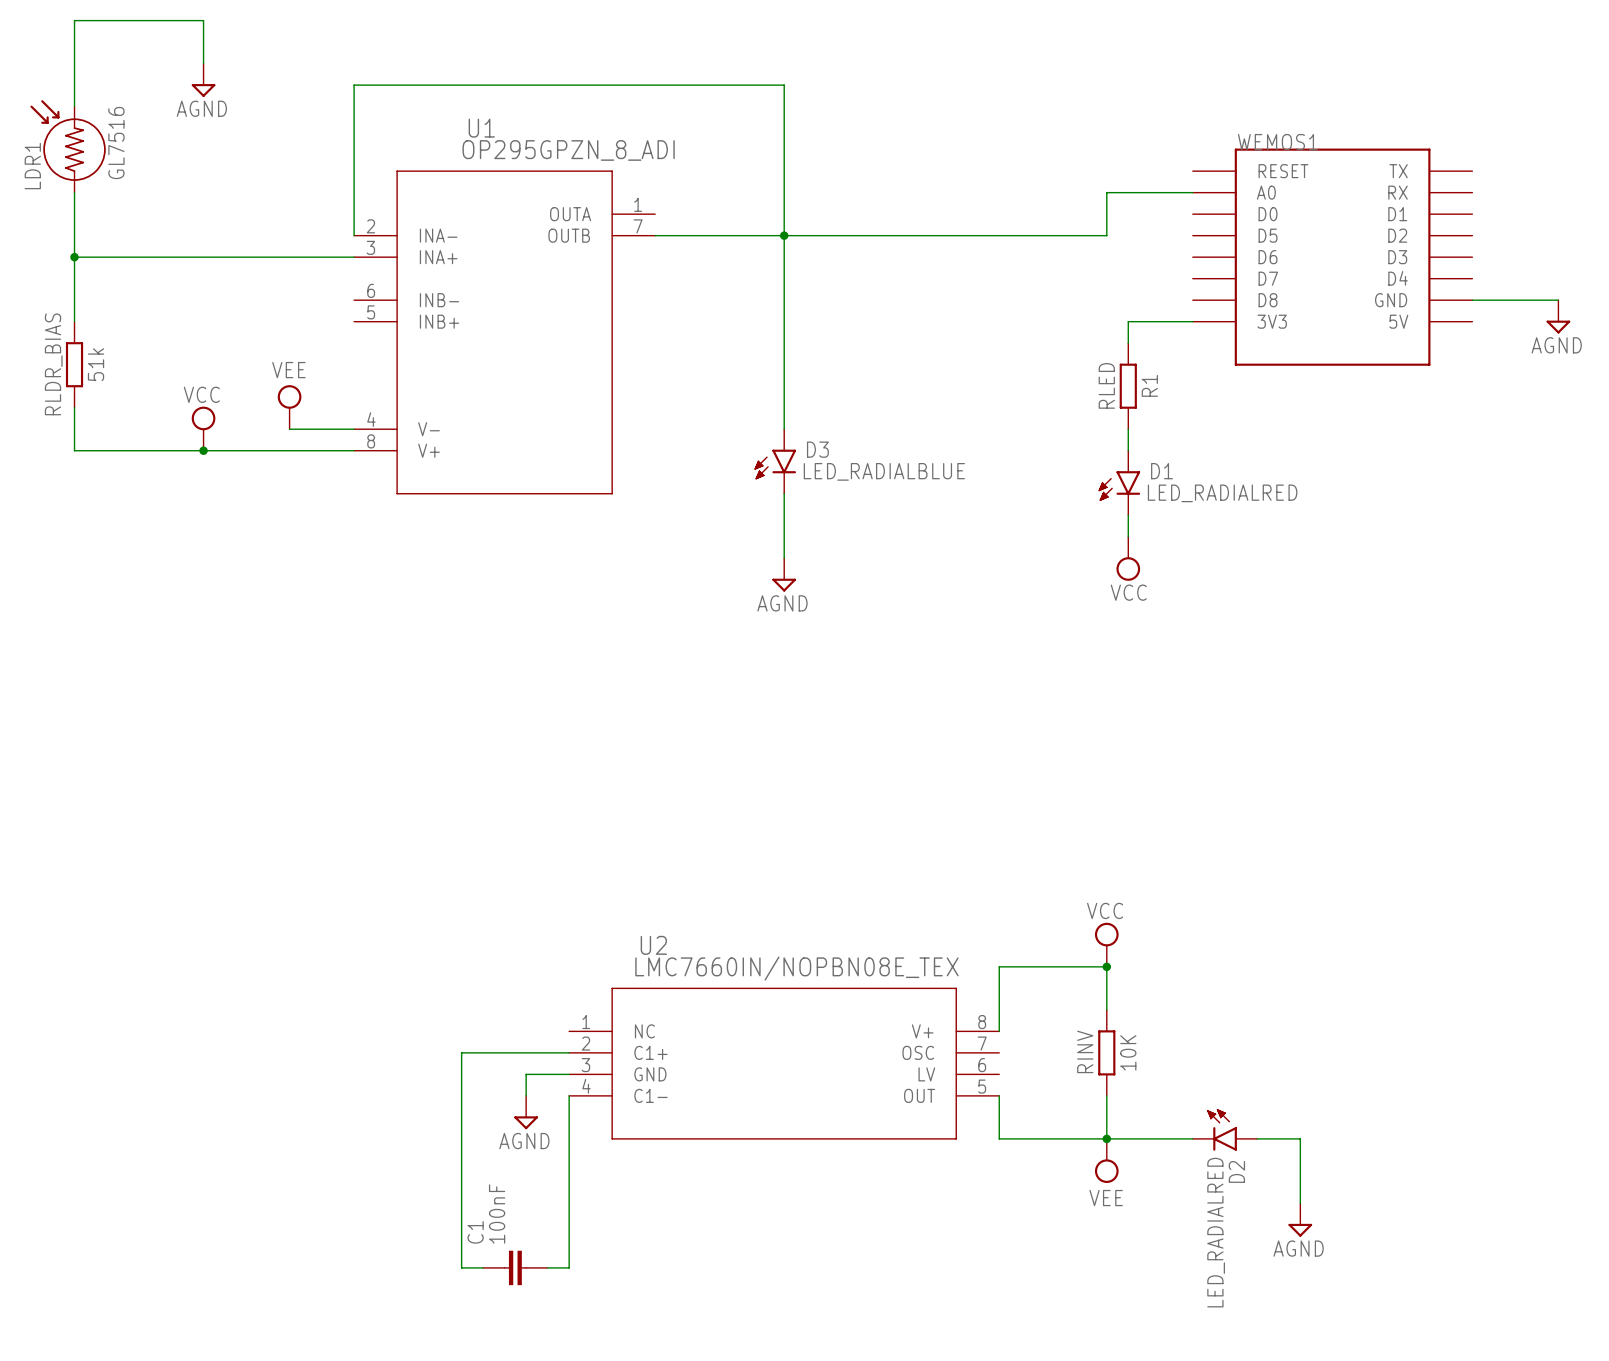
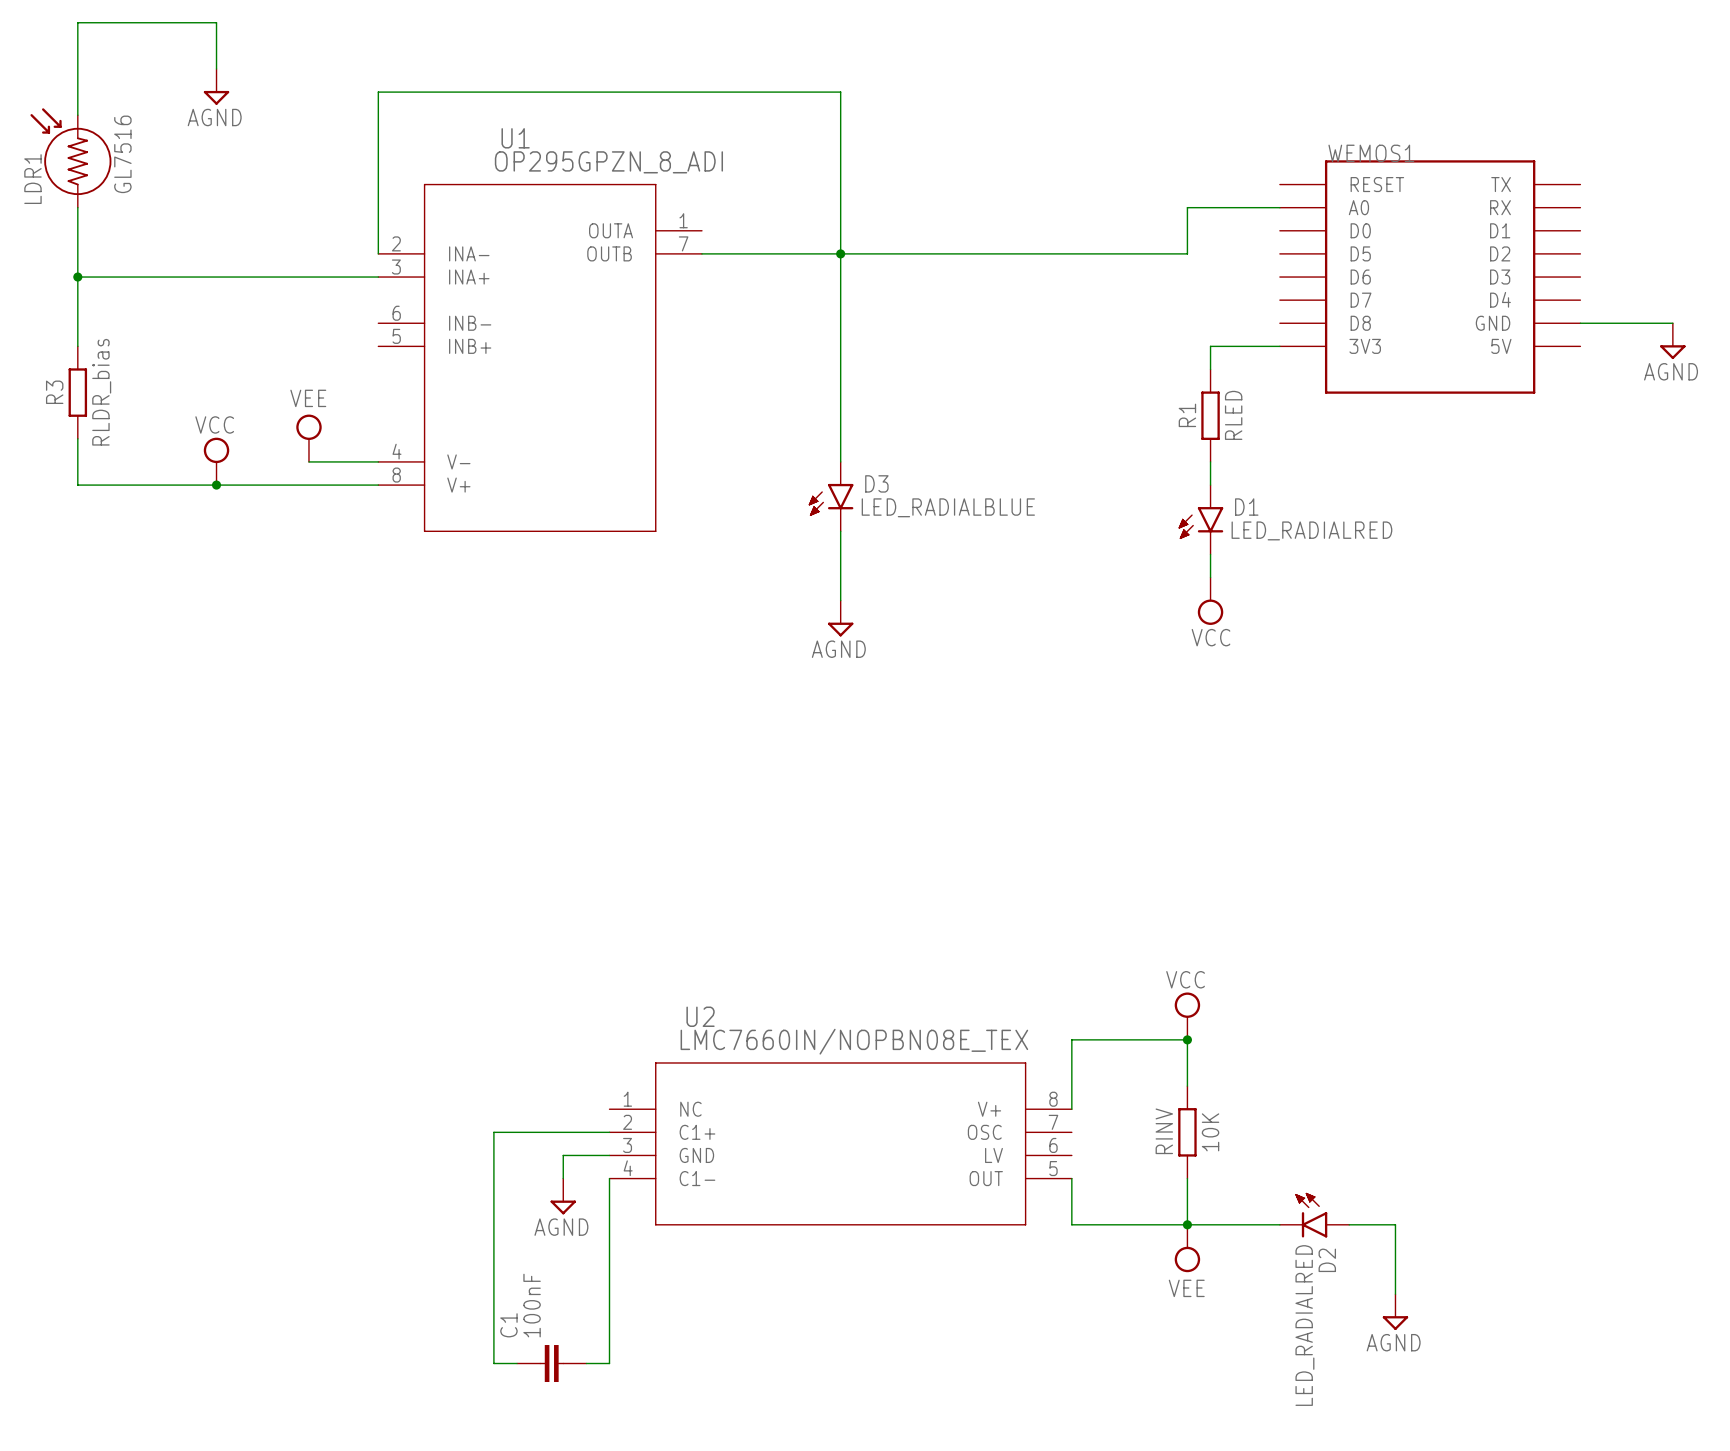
RLDR_BIAS name: RLDR_BIAS (53, 364) -> R3 (54, 392)
RLDR_BIAS value: 51k (96, 364) -> RLDR_bias (101, 392)
RLED name: RLED (1106, 385) -> R1 (1187, 415)
RLED value: R1 (1149, 385) -> RLED (1233, 415)

